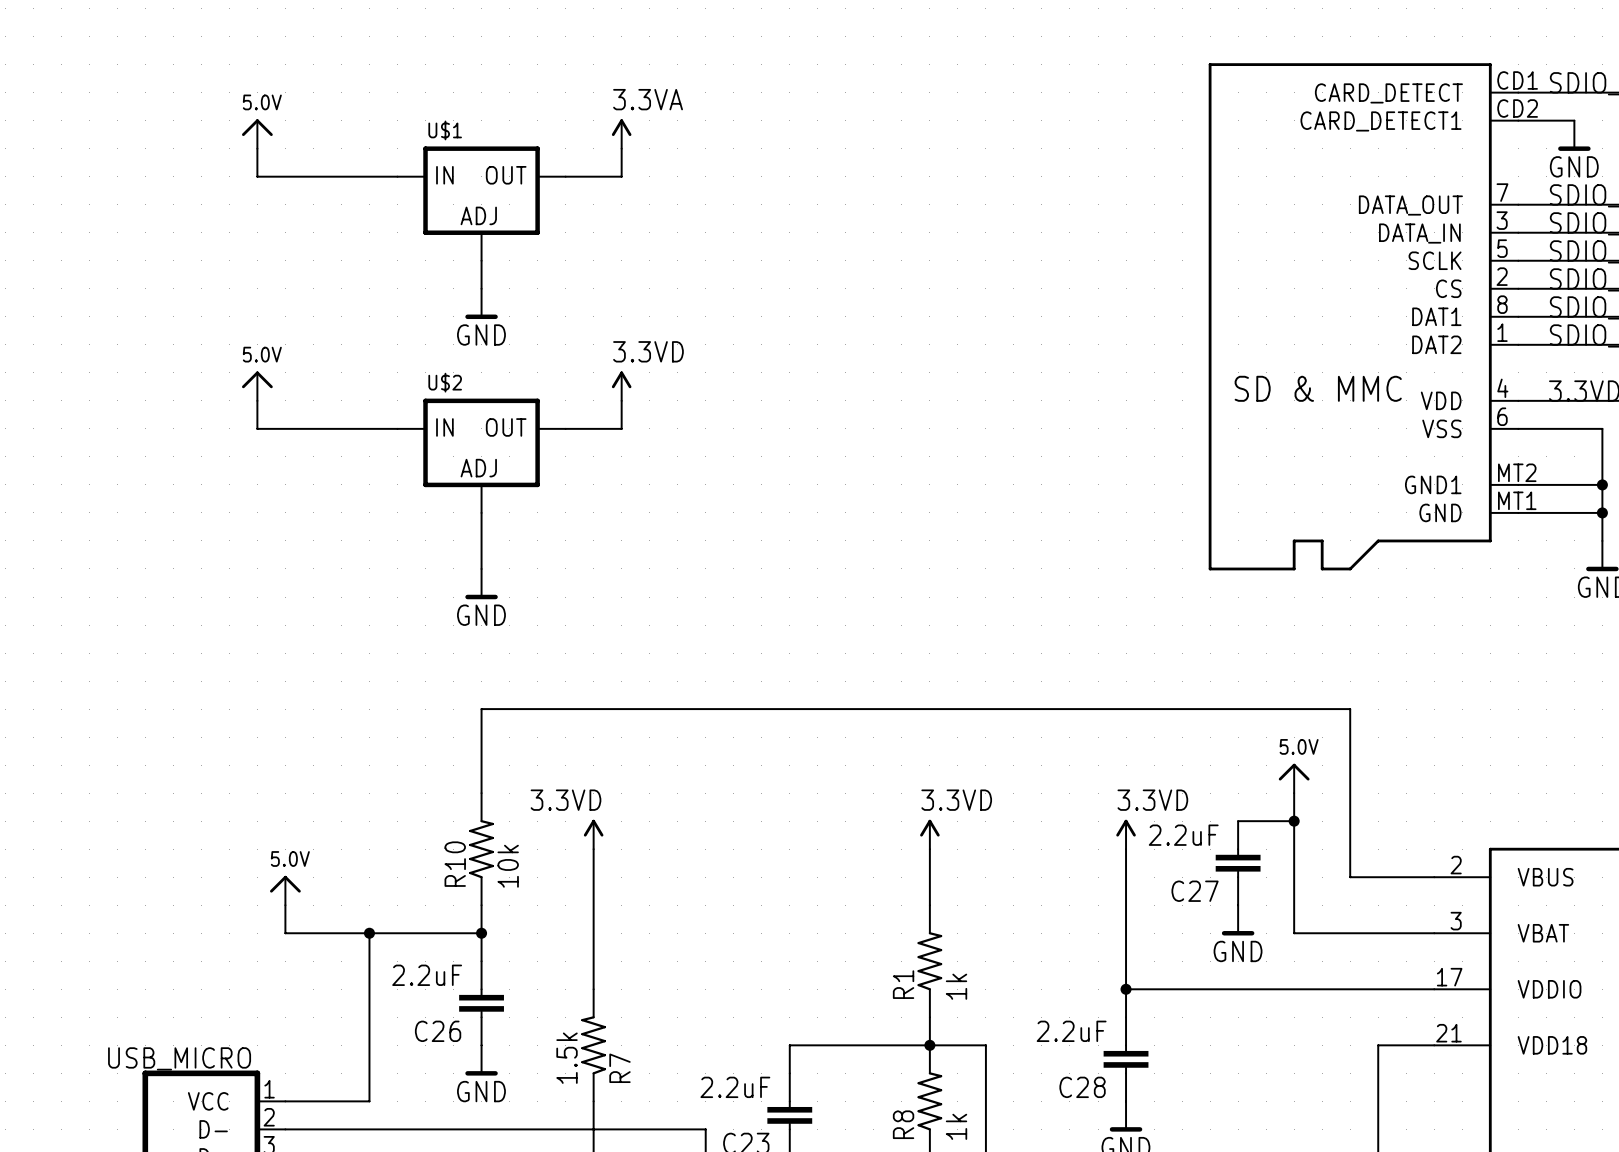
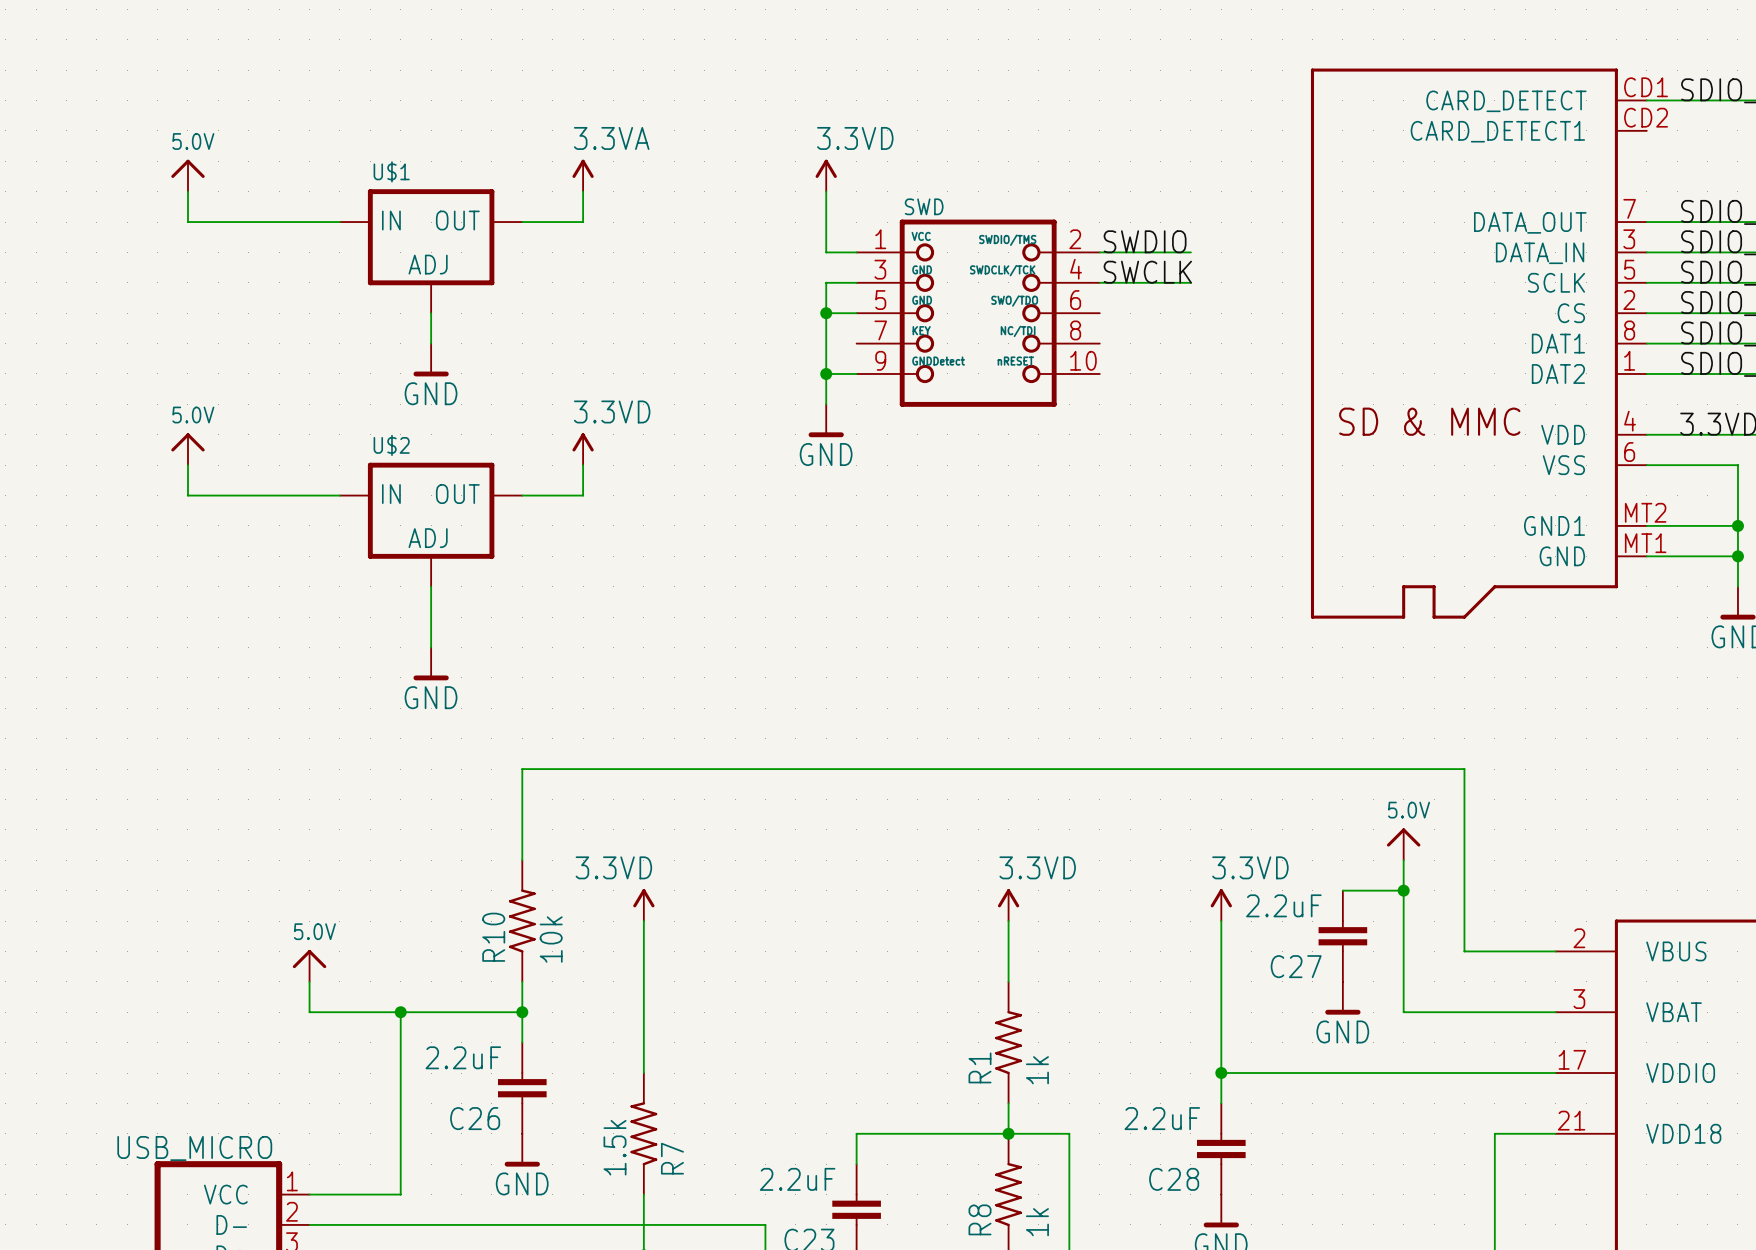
wire: (1518, 120) (1574, 120) -> none
power symbol position: 5.0V (257, 133) -> 5.0V (187, 175)
power symbol position: 3.3VA (621, 133) -> 3.3VA (583, 175)
power symbol: GND (1574, 135) -> none
wire: (257, 148) (257, 176) (397, 176) -> (187, 191) (187, 222) (339, 222)
wire: (621, 148) (621, 176) (565, 176) -> (583, 191) (583, 222) (522, 222)
power symbol: none -> 3.3VD (826, 175)
wire: none -> (826, 191) (826, 252) (856, 252)
U$1 position: (481, 203) -> (431, 251)
label: none -> SWDIO (1145, 241)
wire: none -> (1099, 252) (1190, 252)
label: none -> SWCLK (1147, 272)
wire: (481, 260) (481, 288) -> (431, 313) (431, 343)
wire: none -> (856, 282) (826, 282) (826, 404)
wire: none -> (1099, 282) (1190, 282)
wire: none -> (826, 313) (856, 313)
junction: none -> (826, 313)
SWD: none -> (978, 313)
power symbol position: GND (481, 303) -> GND (431, 360)
wire: none -> (826, 373) (856, 373)
junction: none -> (826, 373)
power symbol position: 5.0V (257, 386) -> 5.0V (187, 449)
power symbol position: 3.3VD (621, 386) -> 3.3VD (583, 449)
power symbol: none -> GND (826, 420)
wire: (257, 400) (257, 428) (397, 428) -> (187, 465) (187, 495) (339, 495)
wire: (621, 400) (621, 428) (565, 428) -> (583, 465) (583, 495) (522, 495)
U$2 position: (481, 455) -> (431, 524)
wire: (481, 512) (481, 568) -> (431, 586) (431, 647)
power symbol position: GND (481, 584) -> GND (431, 663)

